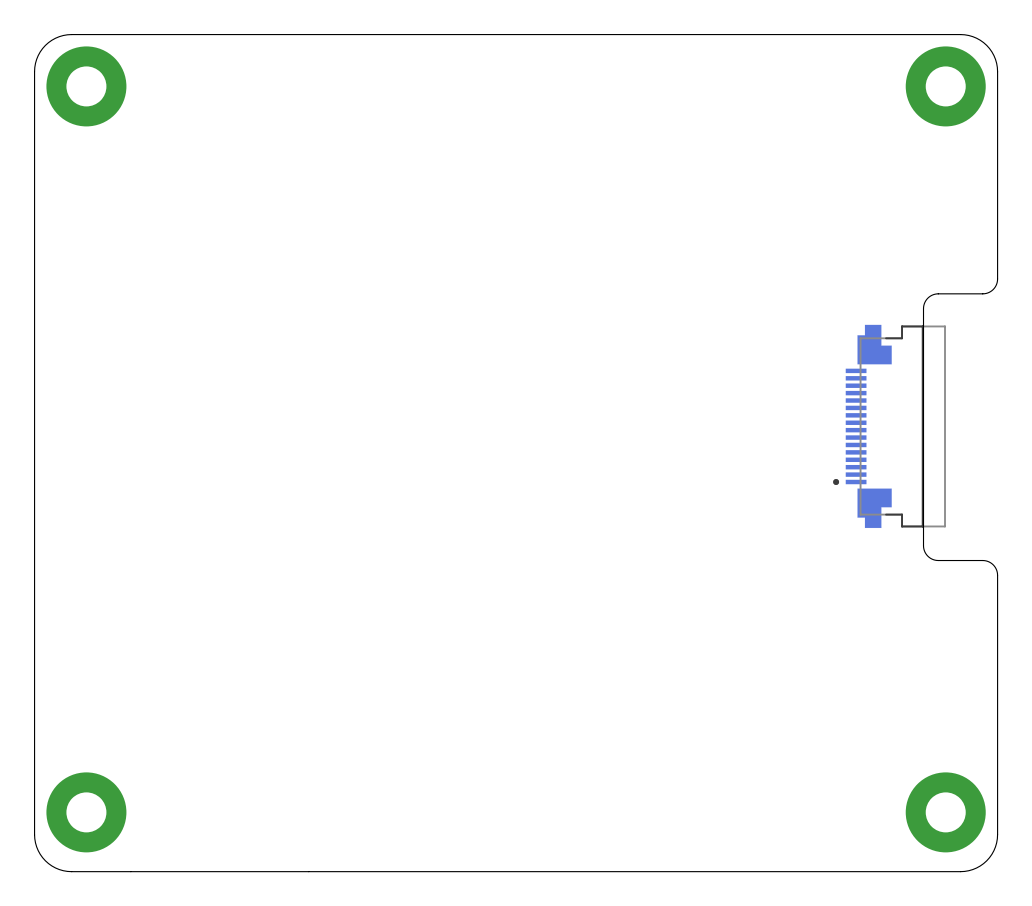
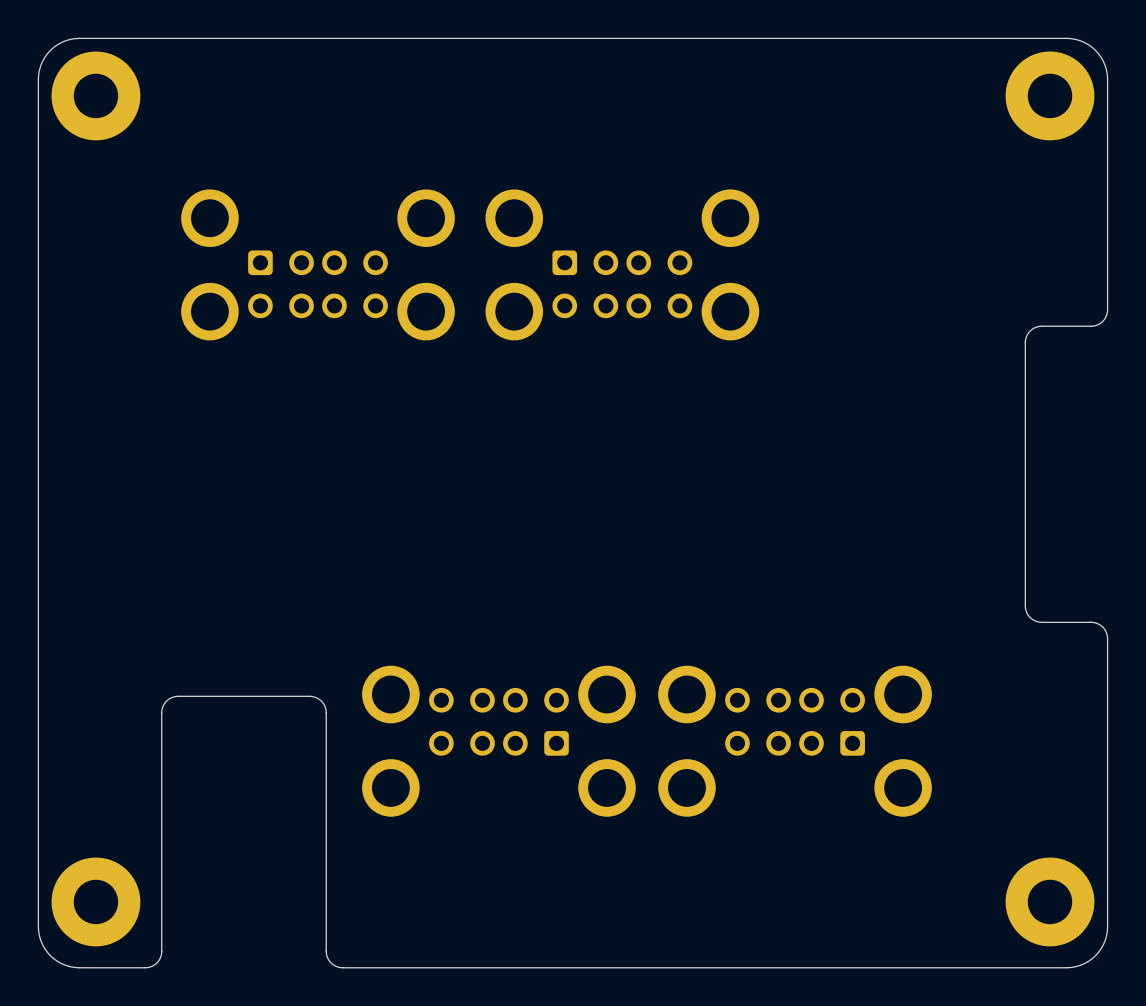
part: none -> (318, 264)
part: none -> (622, 264)
part: (889, 426) -> none
part: none -> (498, 741)
part: none -> (795, 741)
board edge: (308, 871) (130, 871) -> (342, 967) (331, 962) (326, 953) (326, 710) (320, 699) (309, 696) (178, 696) (169, 698) (164, 704) (161, 712) (161, 953) (155, 964) (145, 967)

